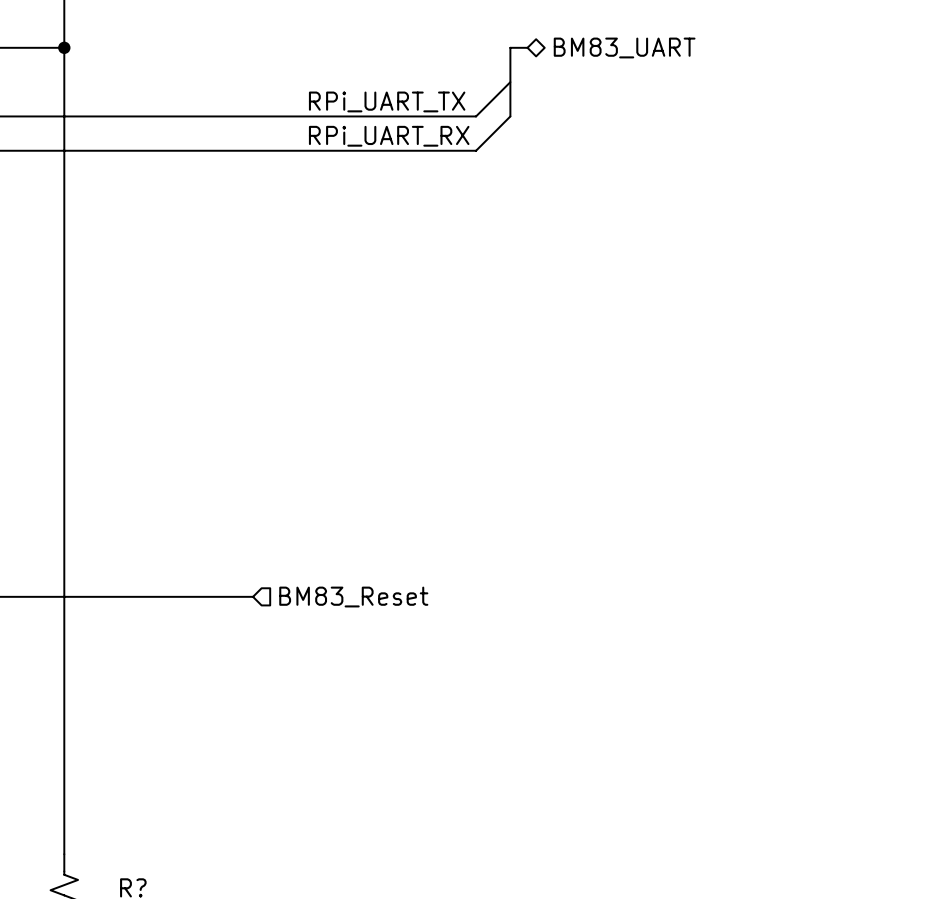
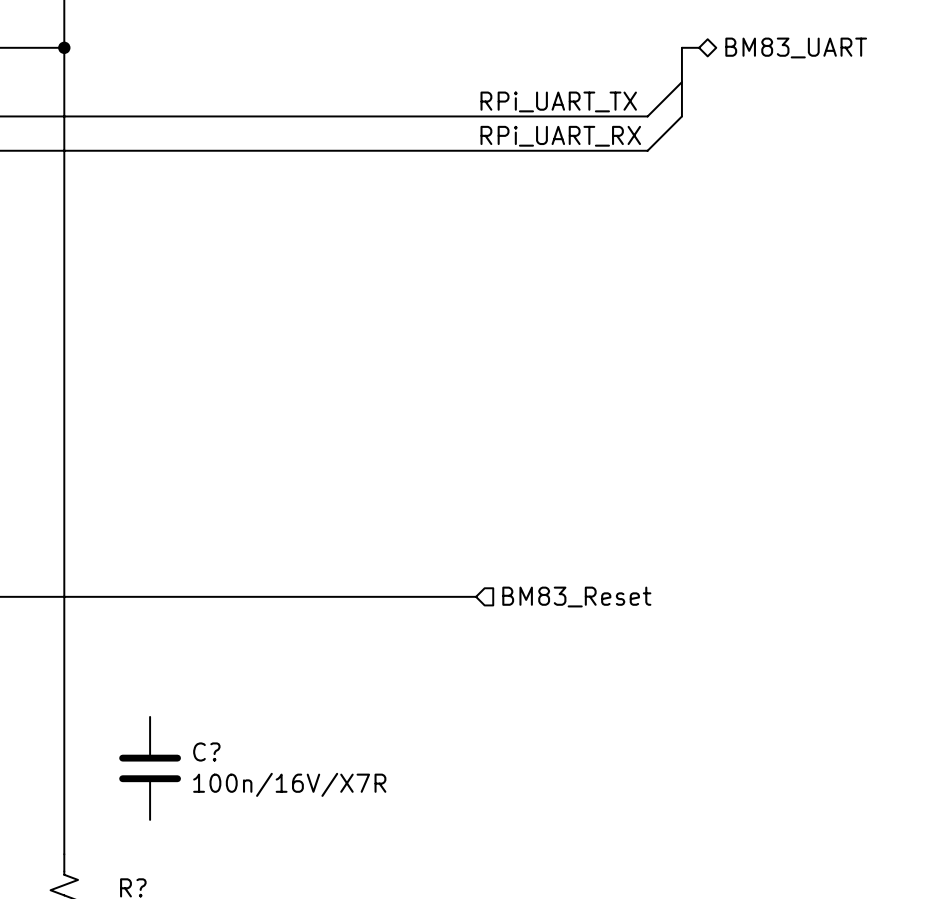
bus: (527, 47) (510, 47) (510, 116) -> (699, 47) (681, 47) (681, 116)
hierarchical label position: BM83_UART (624, 47) -> BM83_UART (796, 47)
wire: (510, 82) (476, 116) -> (681, 82) (647, 116) (476, 116)
label position: RPi_UART_TX (387, 101) -> RPi_UART_TX (558, 101)
wire: (510, 116) (476, 150) -> (681, 116) (647, 150) (476, 150)
label position: RPi_UART_RX (389, 136) -> RPi_UART_RX (560, 136)
wire: none -> (253, 596) (476, 596)
hierarchical label position: BM83_Reset (353, 597) -> BM83_Reset (576, 597)
C?: none -> 100n/16V/X7R (150, 768)

